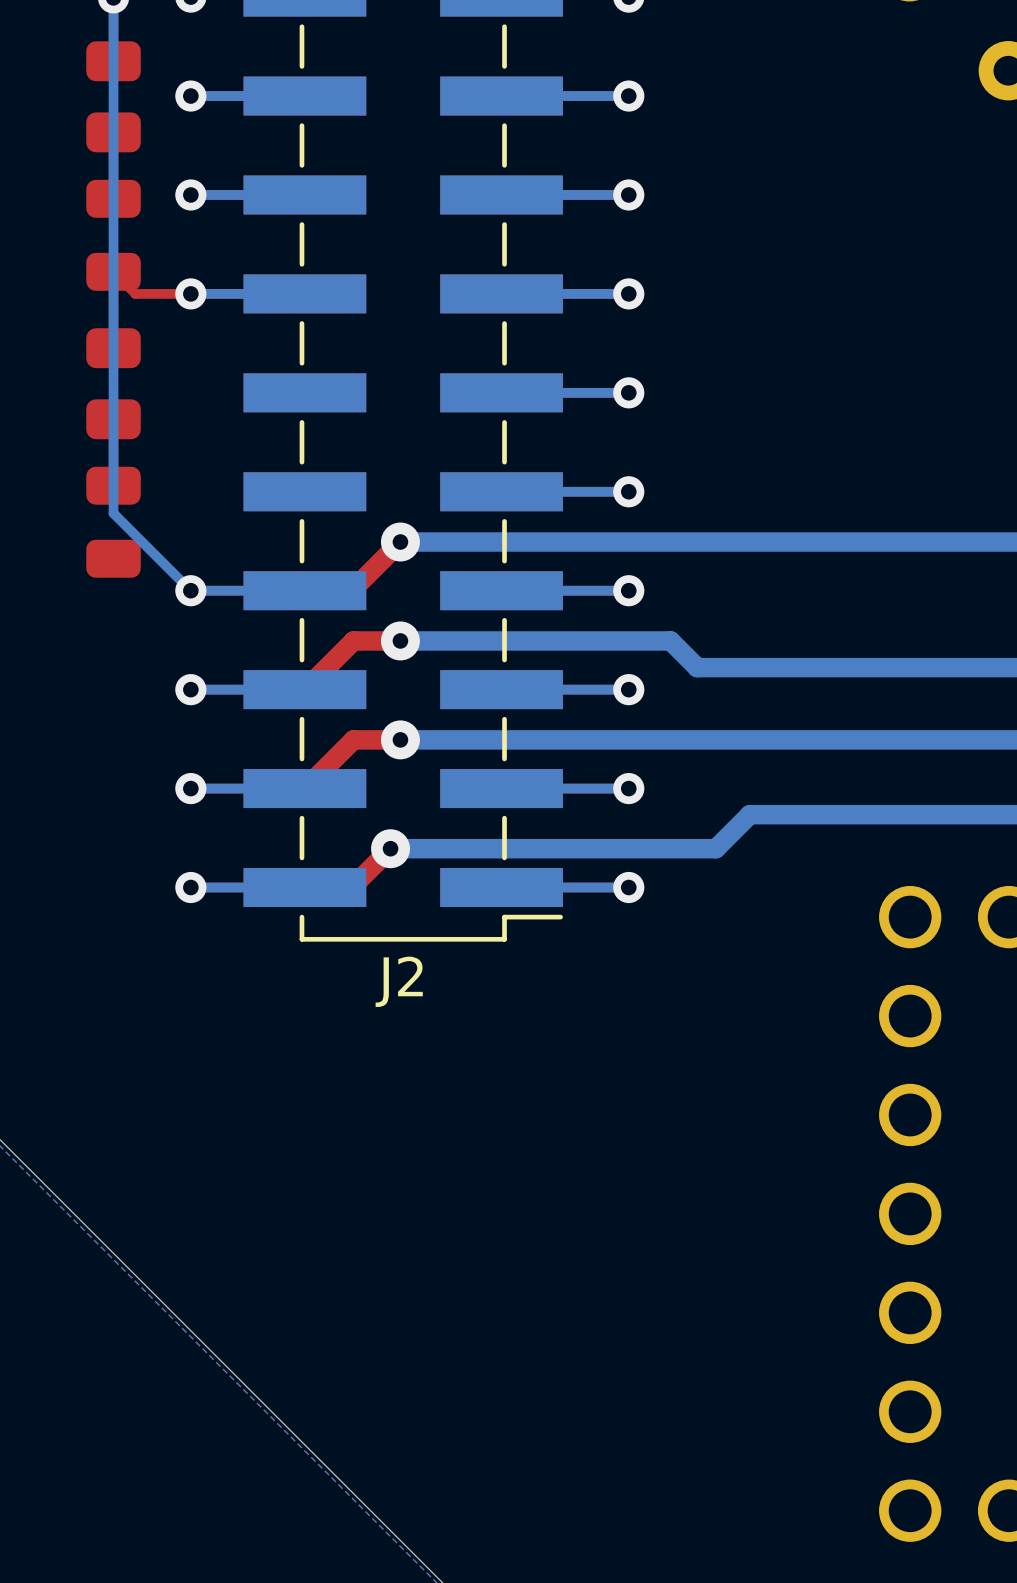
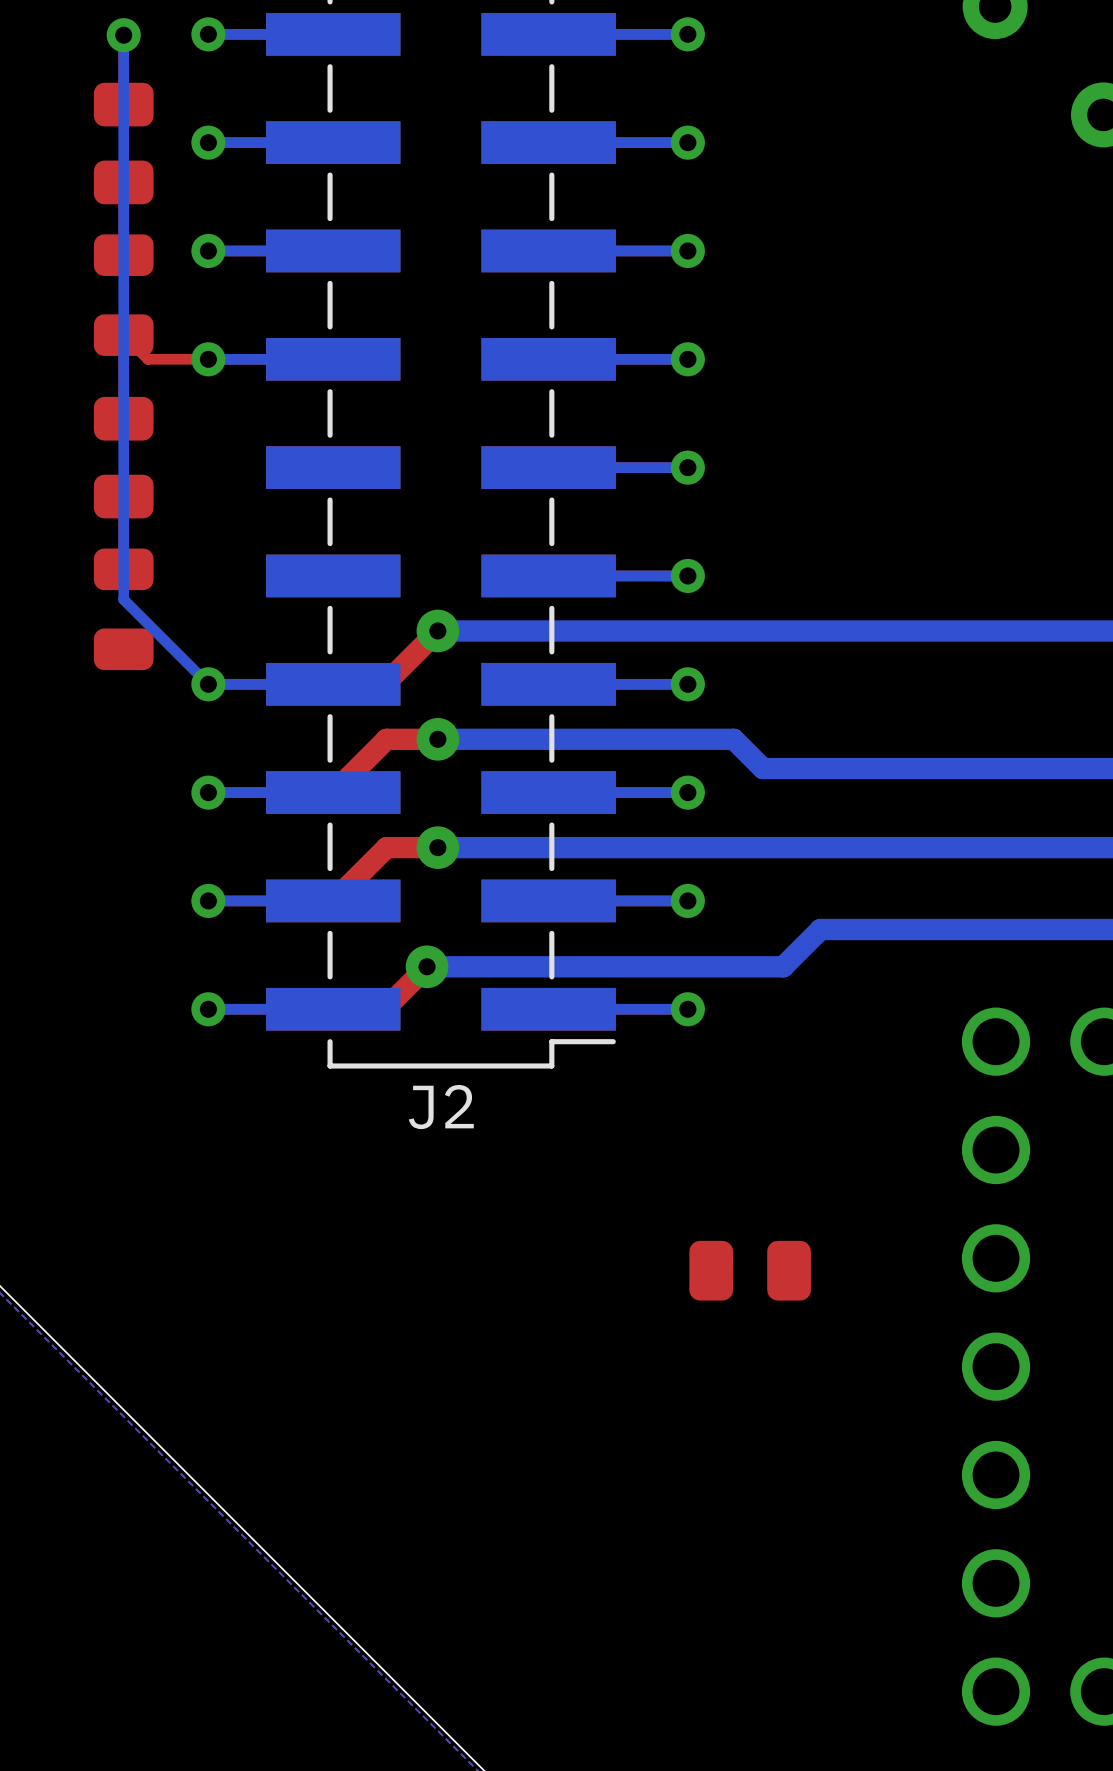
part: none -> (750, 1270)

